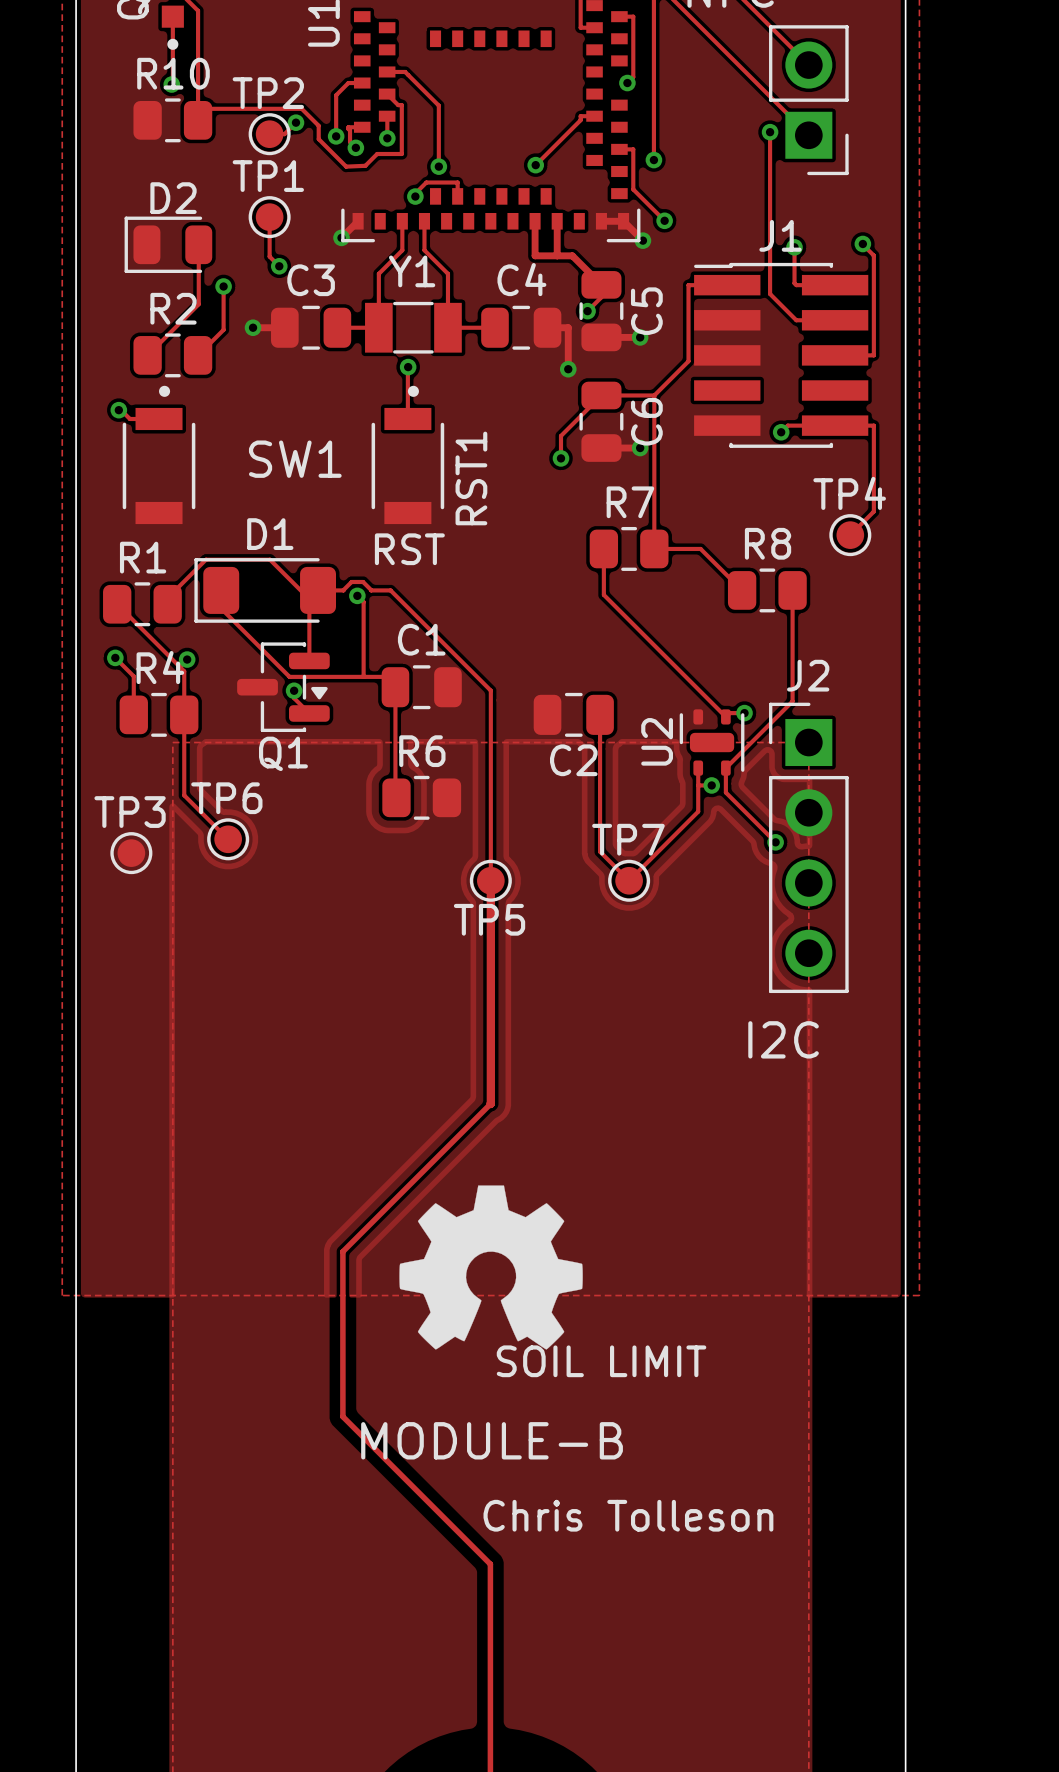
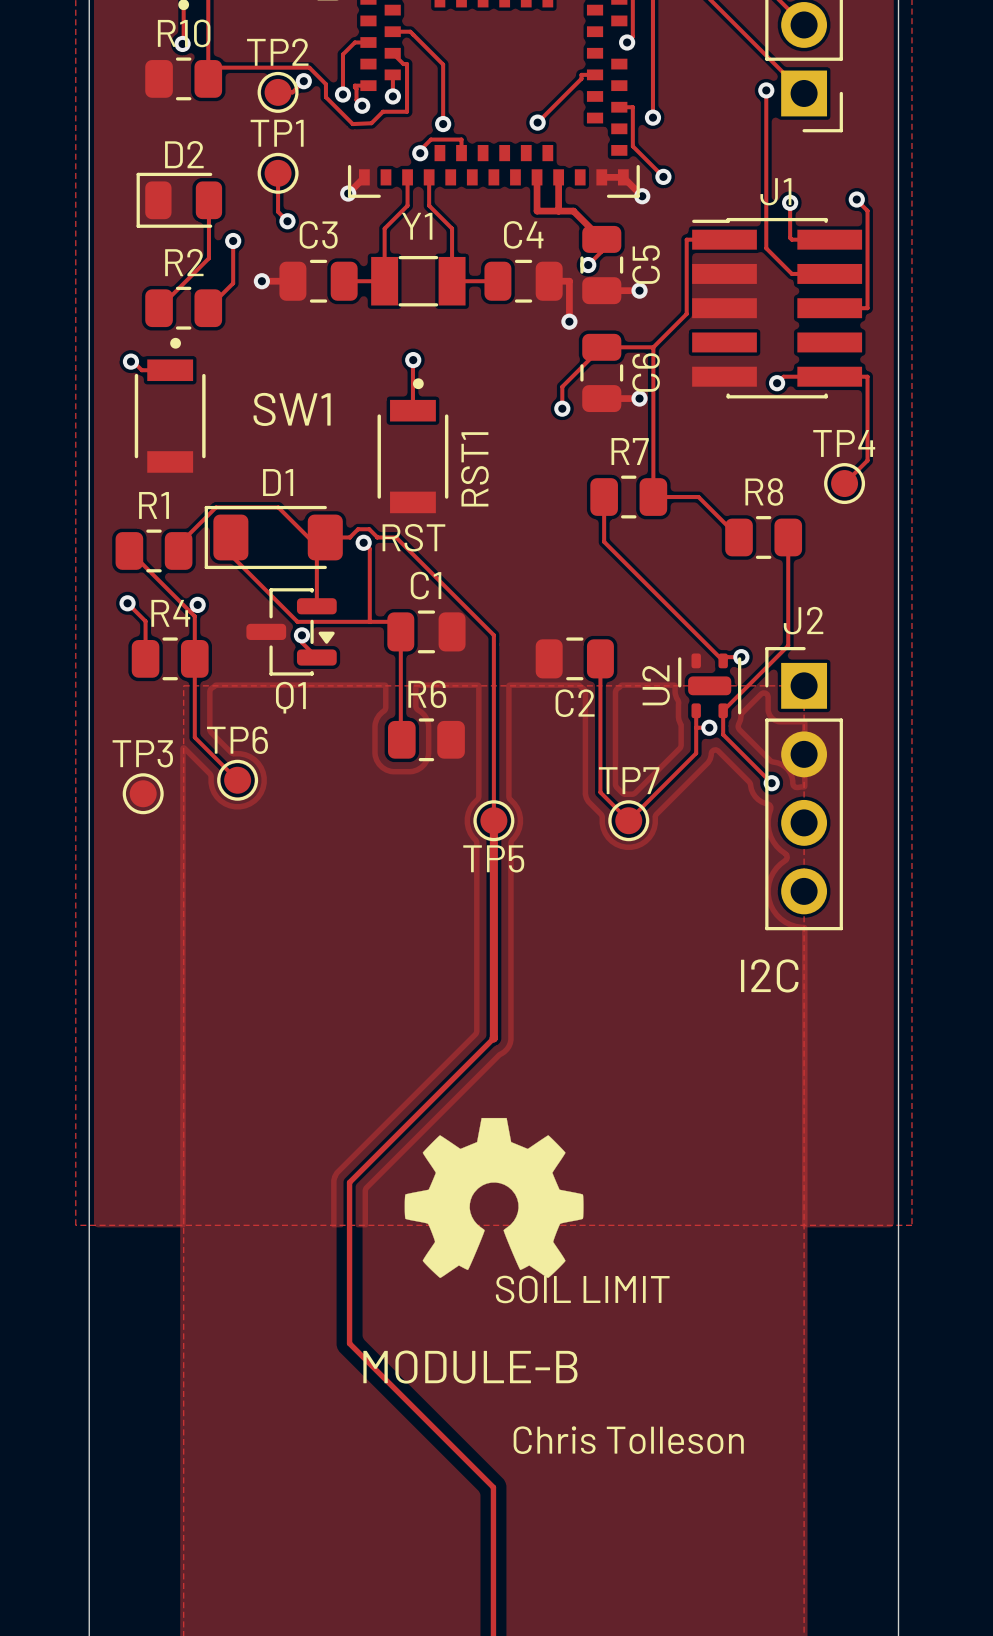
track: (407, 367) (407, 408) -> (412, 370) (412, 410)
via position: (408, 367) -> (413, 360)
RST1 position: (407, 454) -> (412, 445)

